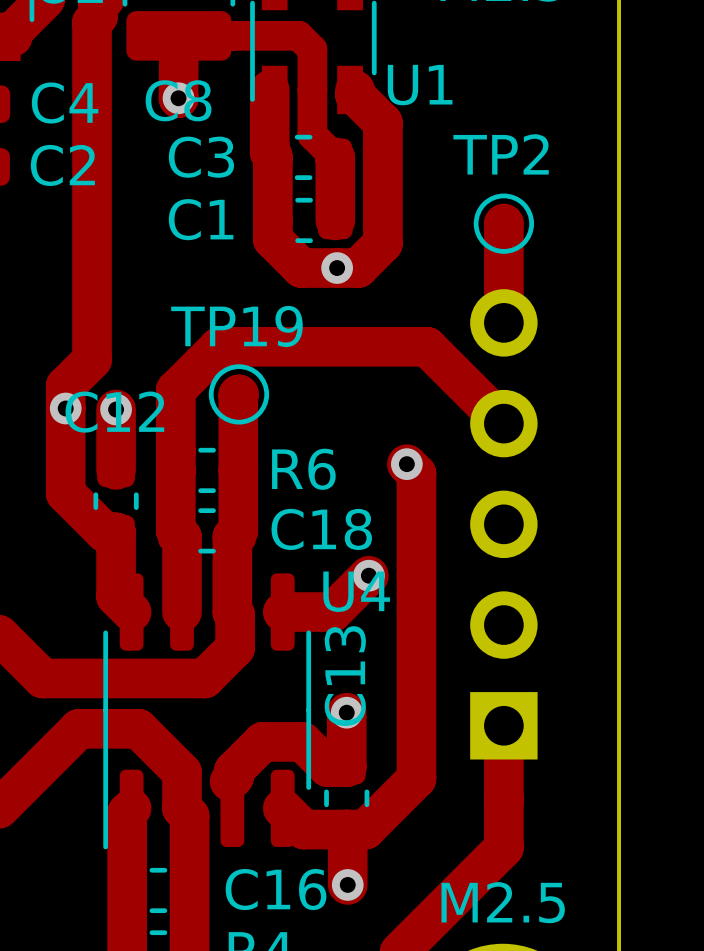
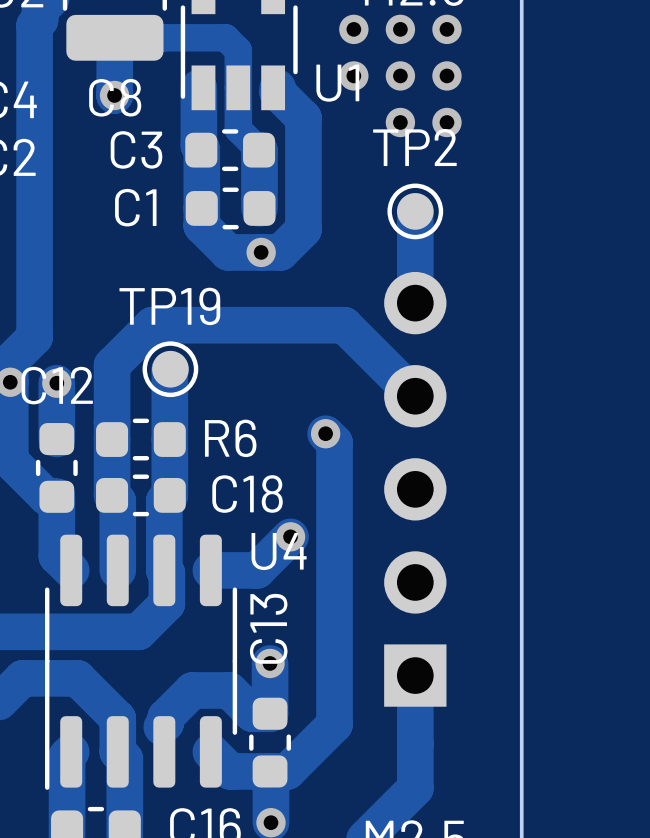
via: none -> (353, 29)
via: none -> (400, 29)
via: none -> (446, 29)
via: none -> (353, 75)
via: none -> (400, 75)
via: none -> (446, 75)
via: none -> (400, 122)
via: none -> (446, 122)

